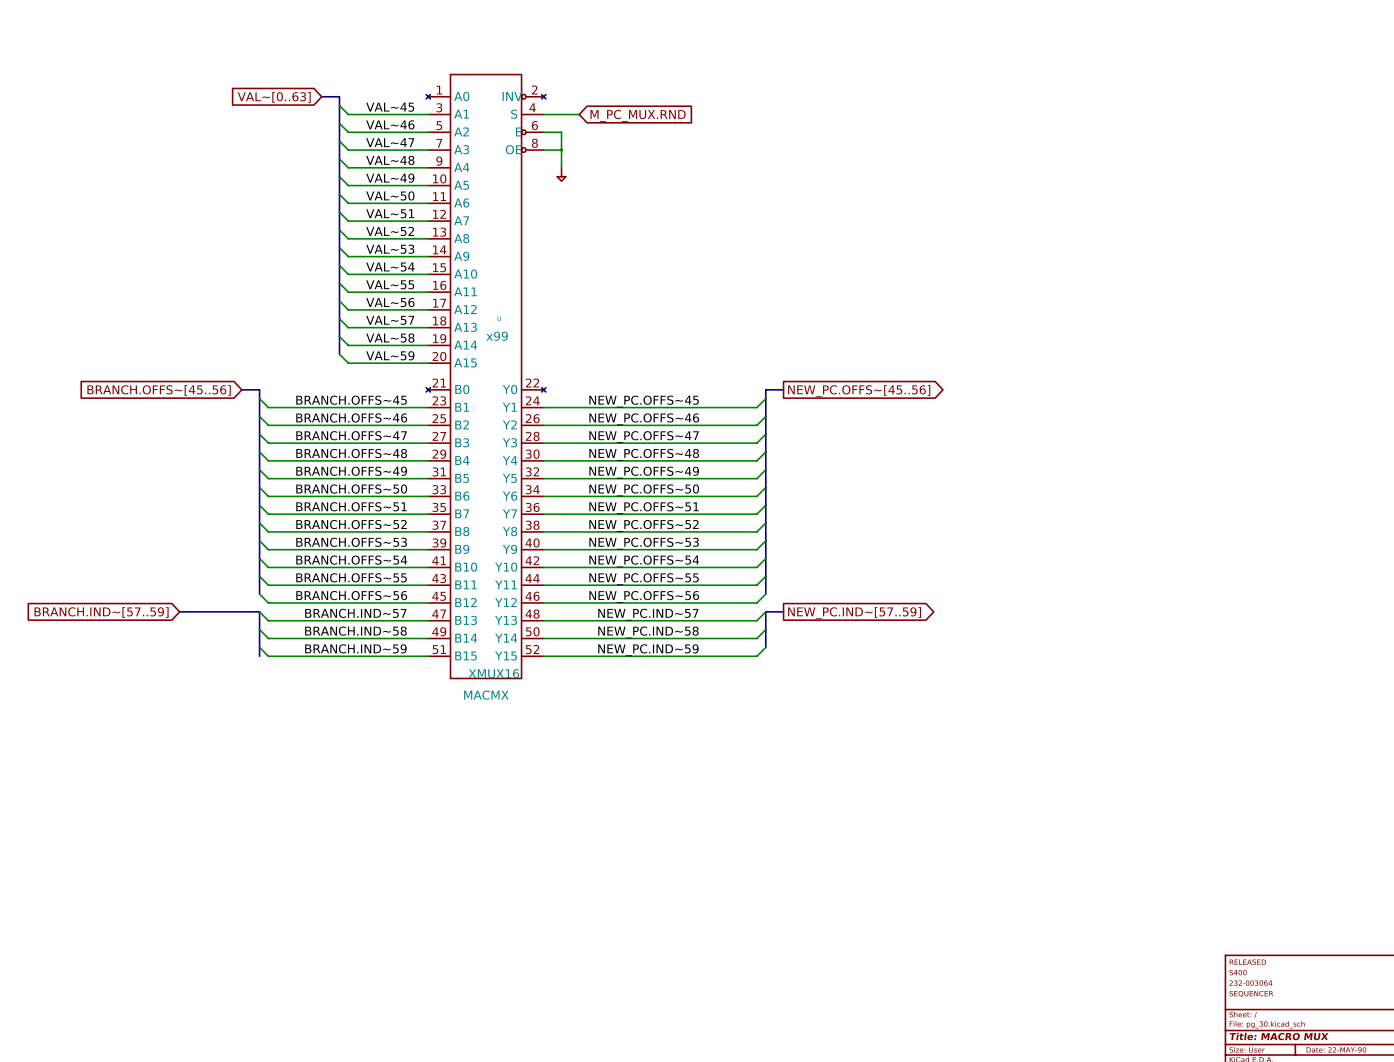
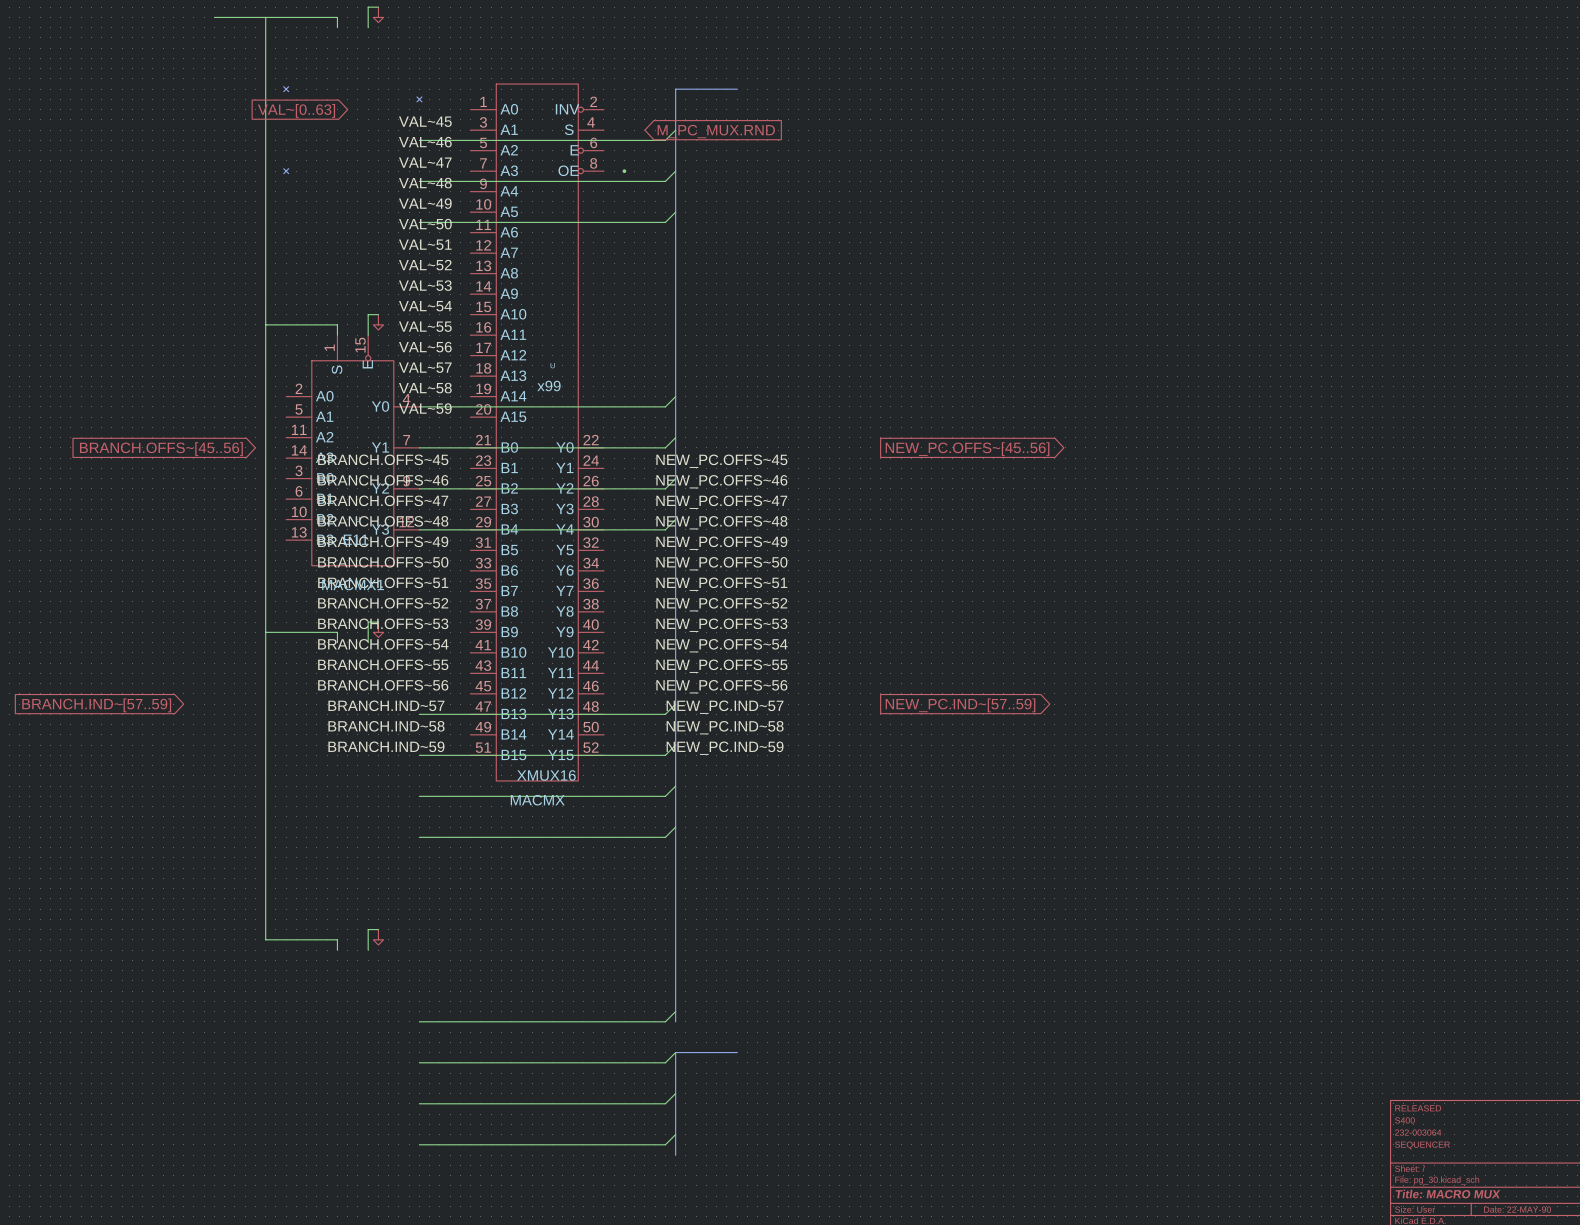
wire: none -> (378, 7) (368, 7) (368, 27)
power symbol: none -> (378, 15)
wire: none -> (214, 17) (337, 17) (337, 27)
wire: none -> (265, 17) (265, 939) (337, 939) (337, 950)
no-connect mark: none -> (286, 89)
bus: none -> (737, 89) (675, 89) (675, 1021)
no-connect mark: none -> (419, 99)
bus: (321, 96) (339, 96) (339, 354) -> none
no-connect mark: (428, 96) -> none
no-connect mark: (543, 96) -> none
wire: (339, 105) (348, 114) (428, 114) -> none
wire: (543, 114) (579, 114) -> none
wire: none -> (675, 130) (665, 140) (419, 140)
wire: (339, 123) (348, 132) (428, 132) -> none
wire: (543, 132) (561, 132) (561, 167) -> none
wire: (339, 141) (348, 150) (428, 150) -> none
no-connect mark: none -> (286, 171)
wire: (543, 150) (561, 150) -> none
wire: none -> (675, 171) (665, 181) (419, 181)
wire: (339, 158) (348, 167) (428, 167) -> none
power symbol: (561, 174) -> none
wire: (339, 176) (348, 185) (428, 185) -> none
wire: none -> (675, 212) (665, 222) (419, 222)
wire: (339, 194) (348, 203) (428, 203) -> none
wire: (339, 212) (348, 221) (428, 221) -> none
wire: (339, 229) (348, 238) (428, 238) -> none
wire: (339, 247) (348, 256) (428, 256) -> none
wire: (339, 265) (348, 274) (428, 274) -> none
power symbol: none -> (378, 322)
wire: none -> (265, 324) (337, 324) (337, 335)
wire: (339, 283) (348, 292) (428, 292) -> none
wire: (339, 301) (348, 309) (428, 309) -> none
wire: (339, 318) (348, 327) (428, 327) -> none
wire: (339, 336) (348, 345) (428, 345) -> none
wire: none -> (675, 396) (665, 406) (419, 406)
wire: (339, 354) (348, 363) (428, 363) -> none
wire: none -> (675, 437) (665, 447) (419, 447)
bus: (241, 389) (259, 389) (259, 594) -> none
no-connect mark: (428, 389) -> none
no-connect mark: (543, 389) -> none
bus: (783, 389) (765, 389) (765, 594) -> none
part: none -> (352, 450)
wire: (259, 398) (268, 407) (428, 407) -> none
wire: (765, 398) (756, 407) (543, 407) -> none
wire: (259, 416) (268, 425) (383, 425) -> none
wire: (765, 416) (756, 425) (597, 425) -> (675, 478) (665, 488)
wire: none -> (470, 488) (603, 488)
wire: (259, 434) (268, 443) (428, 443) -> none
wire: (765, 434) (756, 443) (543, 443) -> none
wire: (259, 452) (268, 460) (383, 460) -> none
wire: (765, 452) (756, 460) (597, 460) -> (675, 519) (665, 529)
wire: none -> (470, 529) (603, 529)
wire: (259, 469) (268, 478) (428, 478) -> none
wire: (765, 469) (756, 478) (543, 478) -> none
wire: (259, 487) (268, 496) (428, 496) -> none
wire: (765, 487) (756, 496) (543, 496) -> none
wire: (259, 505) (268, 514) (428, 514) -> none
wire: (765, 505) (756, 514) (543, 514) -> none
wire: (259, 523) (268, 531) (428, 531) -> none
wire: (765, 523) (756, 531) (543, 531) -> none
wire: (259, 540) (268, 549) -> (265, 632) (286, 632)
wire: none -> (378, 622) (368, 622) (368, 642)
wire: (765, 540) (756, 549) (543, 549) -> none
power symbol: none -> (378, 629)
wire: (312, 549) (428, 549) -> (337, 632) (337, 642)
wire: (259, 558) (268, 567) (428, 567) -> none
wire: (765, 558) (756, 567) (543, 567) -> none
wire: (259, 576) (268, 585) (428, 585) -> none
wire: (765, 576) (756, 585) (543, 585) -> none
wire: (259, 594) (268, 602) (428, 602) -> none
wire: (765, 594) (756, 602) (543, 602) -> none
bus: (179, 611) (259, 611) (259, 656) -> none
wire: (259, 611) (268, 620) (383, 620) -> none
wire: (765, 611) (756, 620) (597, 620) -> (675, 704) (665, 714)
bus: (783, 611) (765, 611) (765, 647) -> none
wire: none -> (470, 714) (603, 714)
wire: (259, 629) (268, 638) (428, 638) -> none
wire: (765, 629) (756, 638) (543, 638) -> none
wire: (259, 647) (268, 656) (383, 656) -> none
wire: (765, 647) (756, 656) (597, 656) -> (675, 745) (665, 755)
wire: none -> (470, 755) (603, 755)
wire: none -> (675, 786) (665, 796) (419, 796)
wire: none -> (675, 827) (665, 837) (419, 837)
wire: none -> (378, 929) (368, 929) (368, 950)
power symbol: none -> (378, 937)
wire: none -> (675, 1011) (665, 1021) (419, 1021)
wire: none -> (675, 1052) (665, 1062) (419, 1062)
bus: none -> (737, 1052) (675, 1052) (675, 1155)
wire: none -> (675, 1093) (665, 1103) (419, 1103)
wire: none -> (675, 1134) (665, 1144) (419, 1144)

